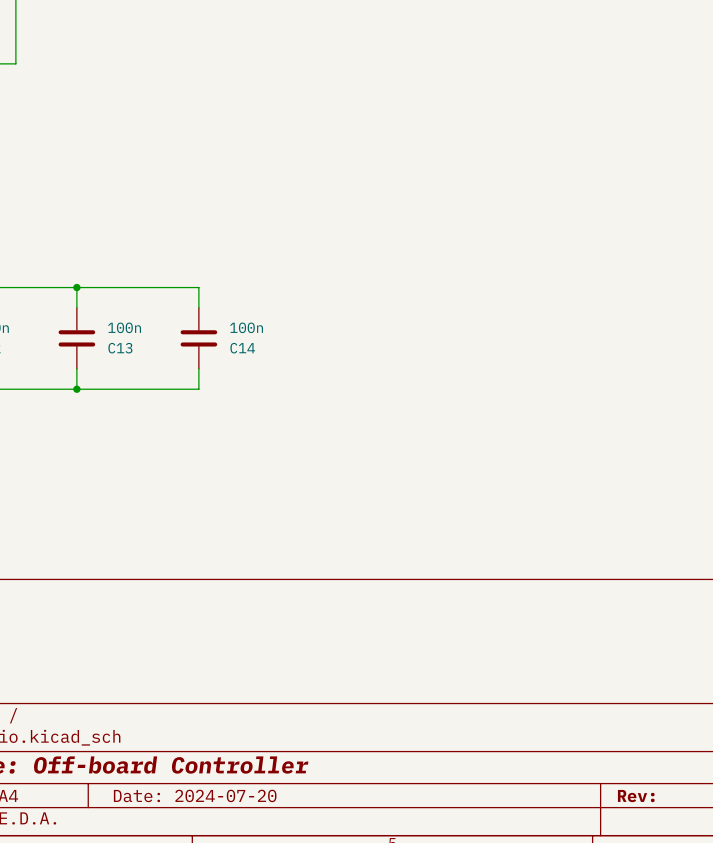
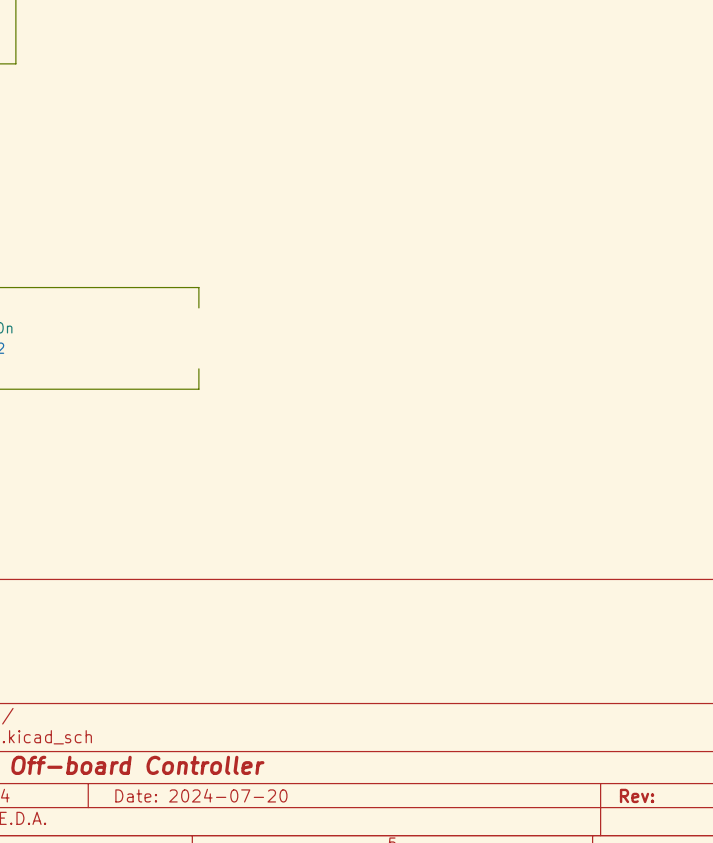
wire: (76, 287) (76, 307) -> none
junction: (76, 287) -> none
C13: 100n (76, 338) -> none
C14: 100n (198, 338) -> none
wire: (76, 368) (76, 389) -> none
junction: (76, 389) -> none

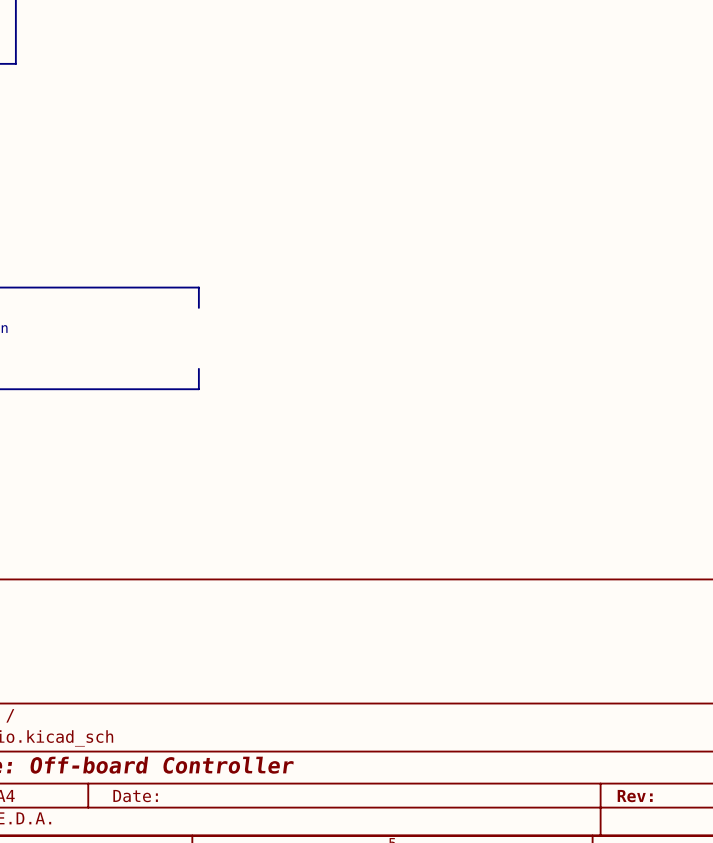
title block: Date: 2024-07-20 (201, 795) -> Date: (135, 796)

